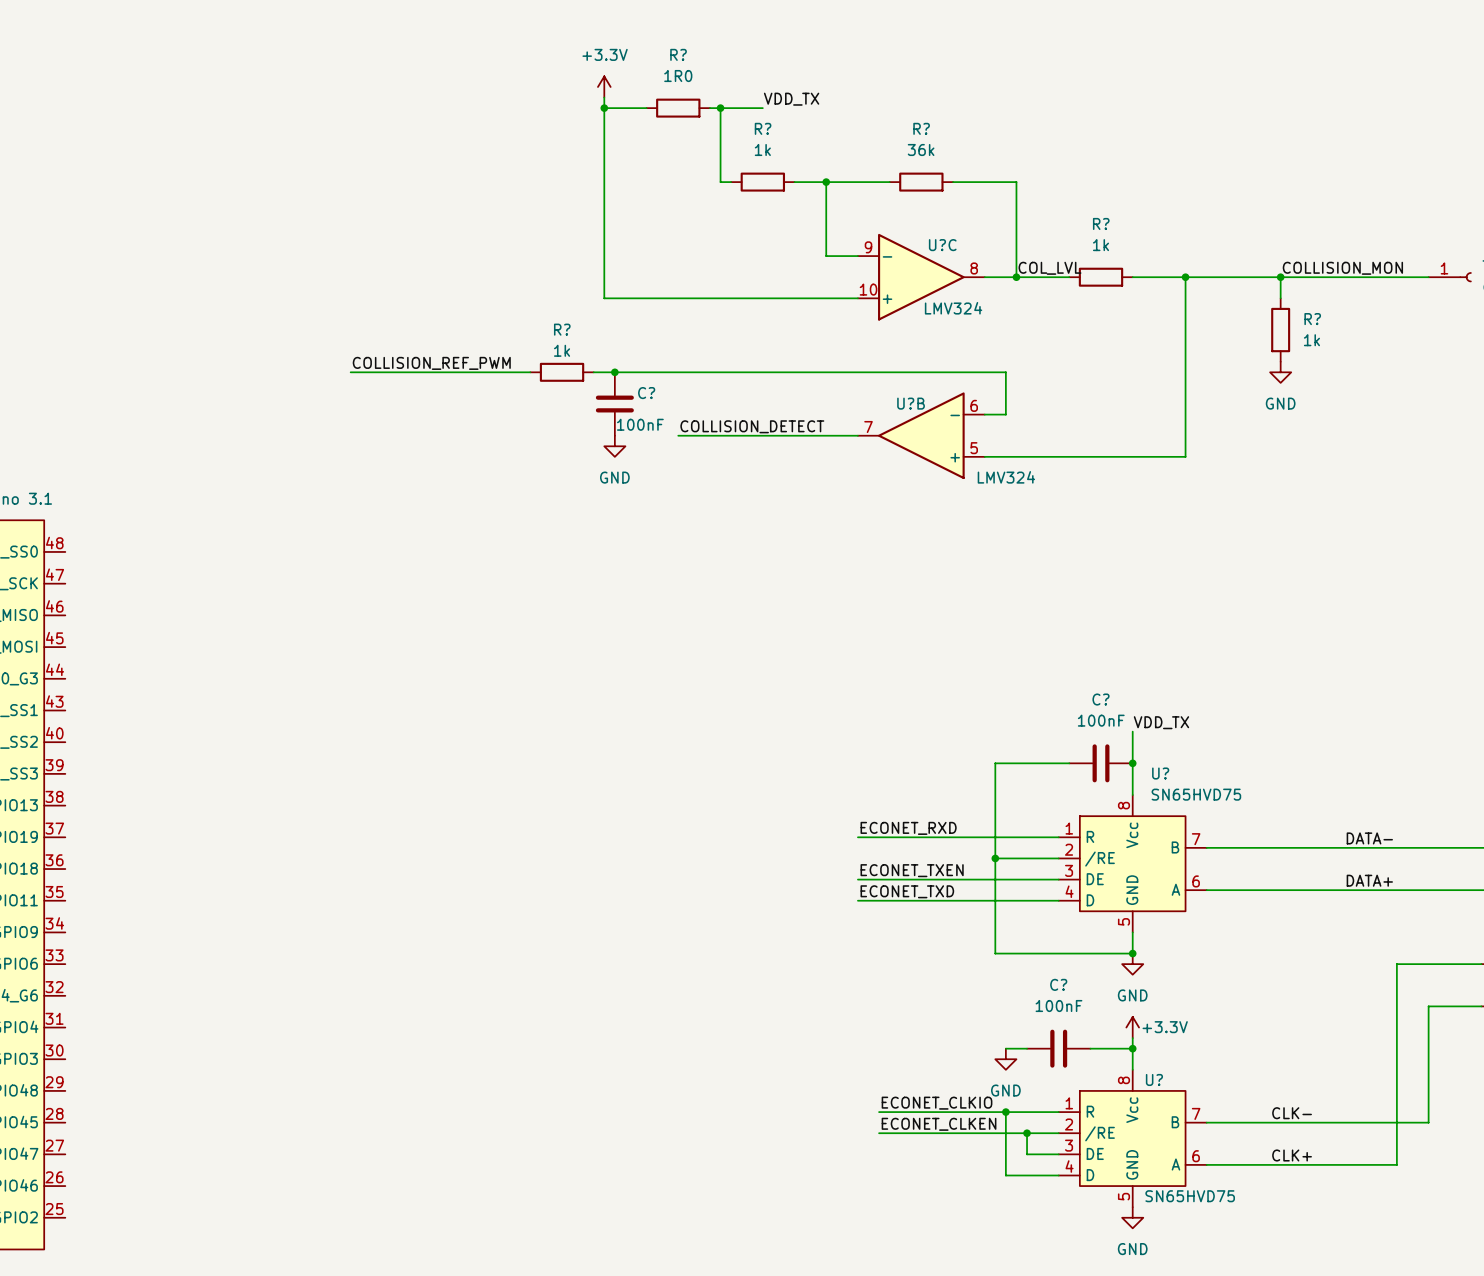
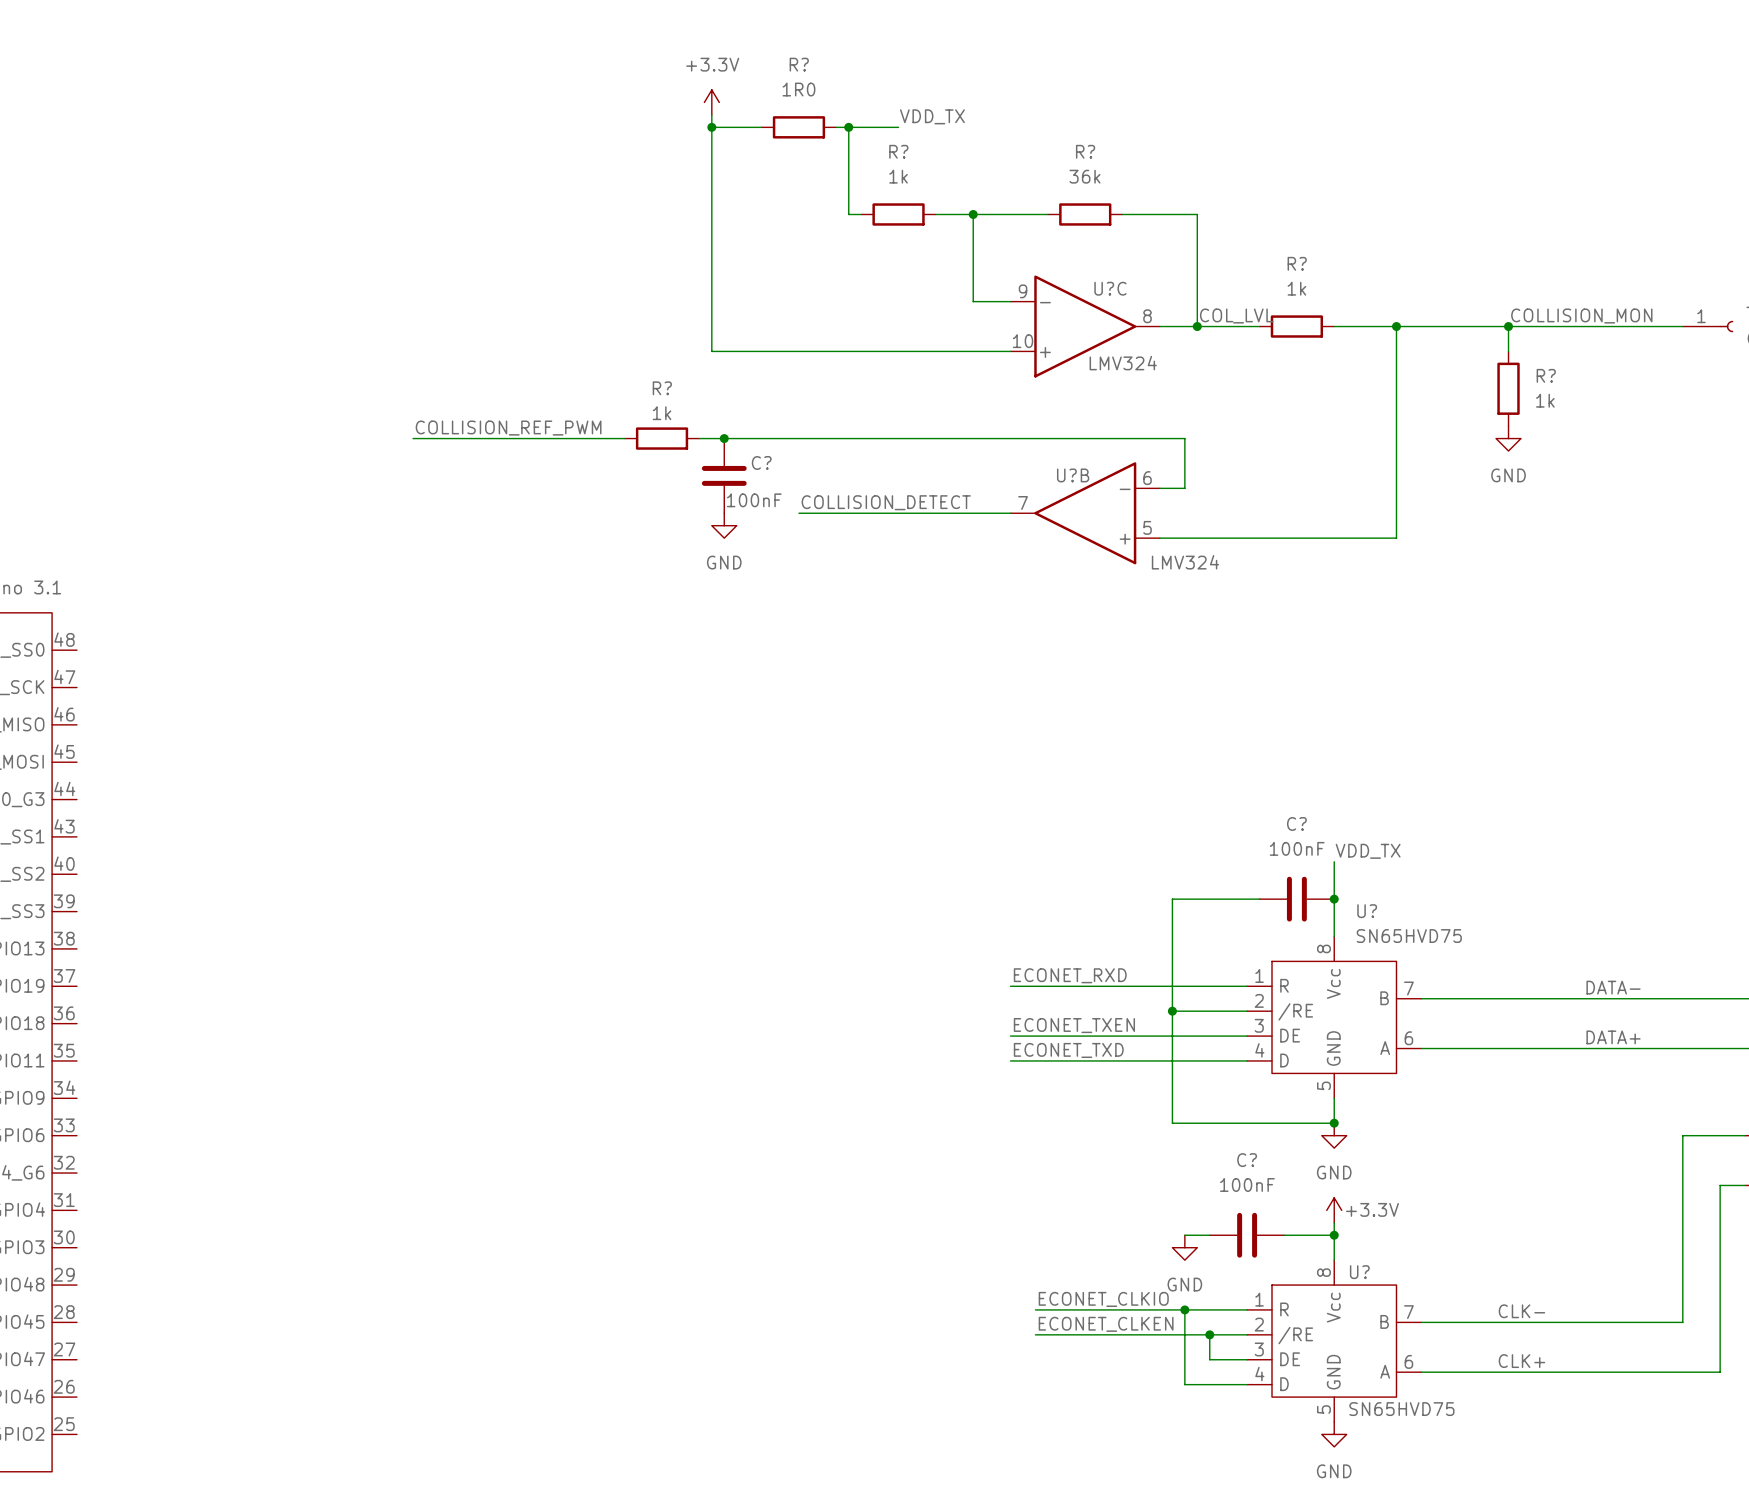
wire: (1428, 964) (1396, 964) (1396, 1164) -> (1720, 1185) (1720, 1372) (1645, 1372)
wire: (1428, 1006) (1460, 1006) -> (1682, 1185) (1682, 1135)

